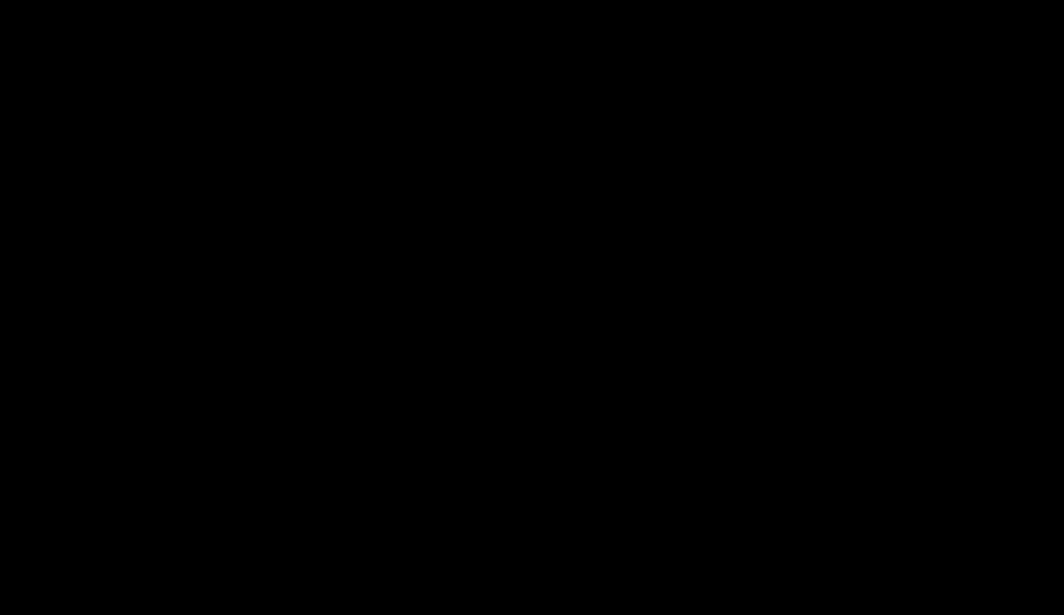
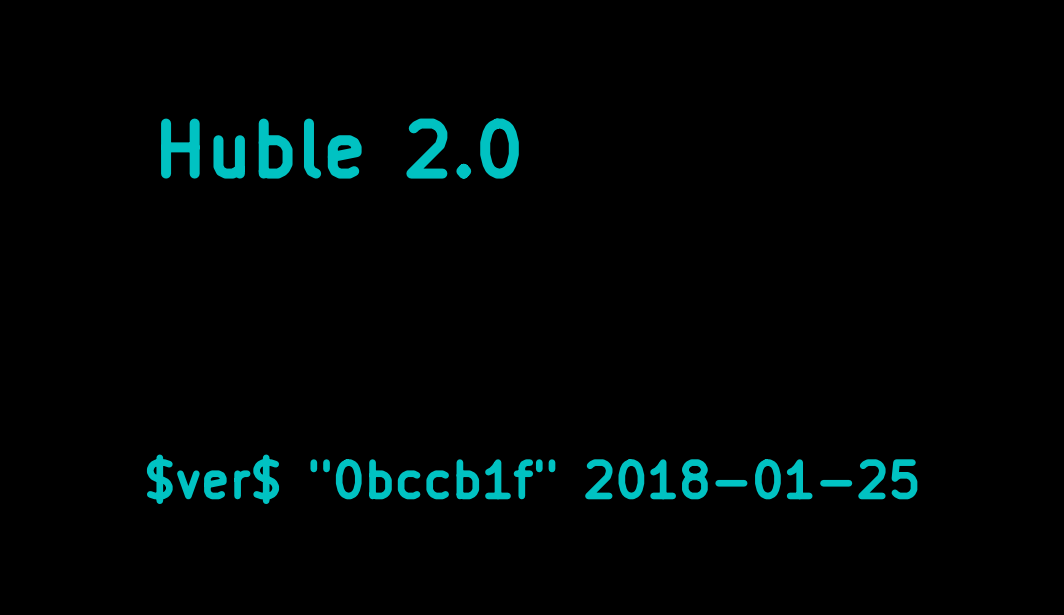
text: none -> Huble 2.0 (339, 148)
text: none -> $ver$ "0bccb1f" 2018-01-25 (532, 479)

